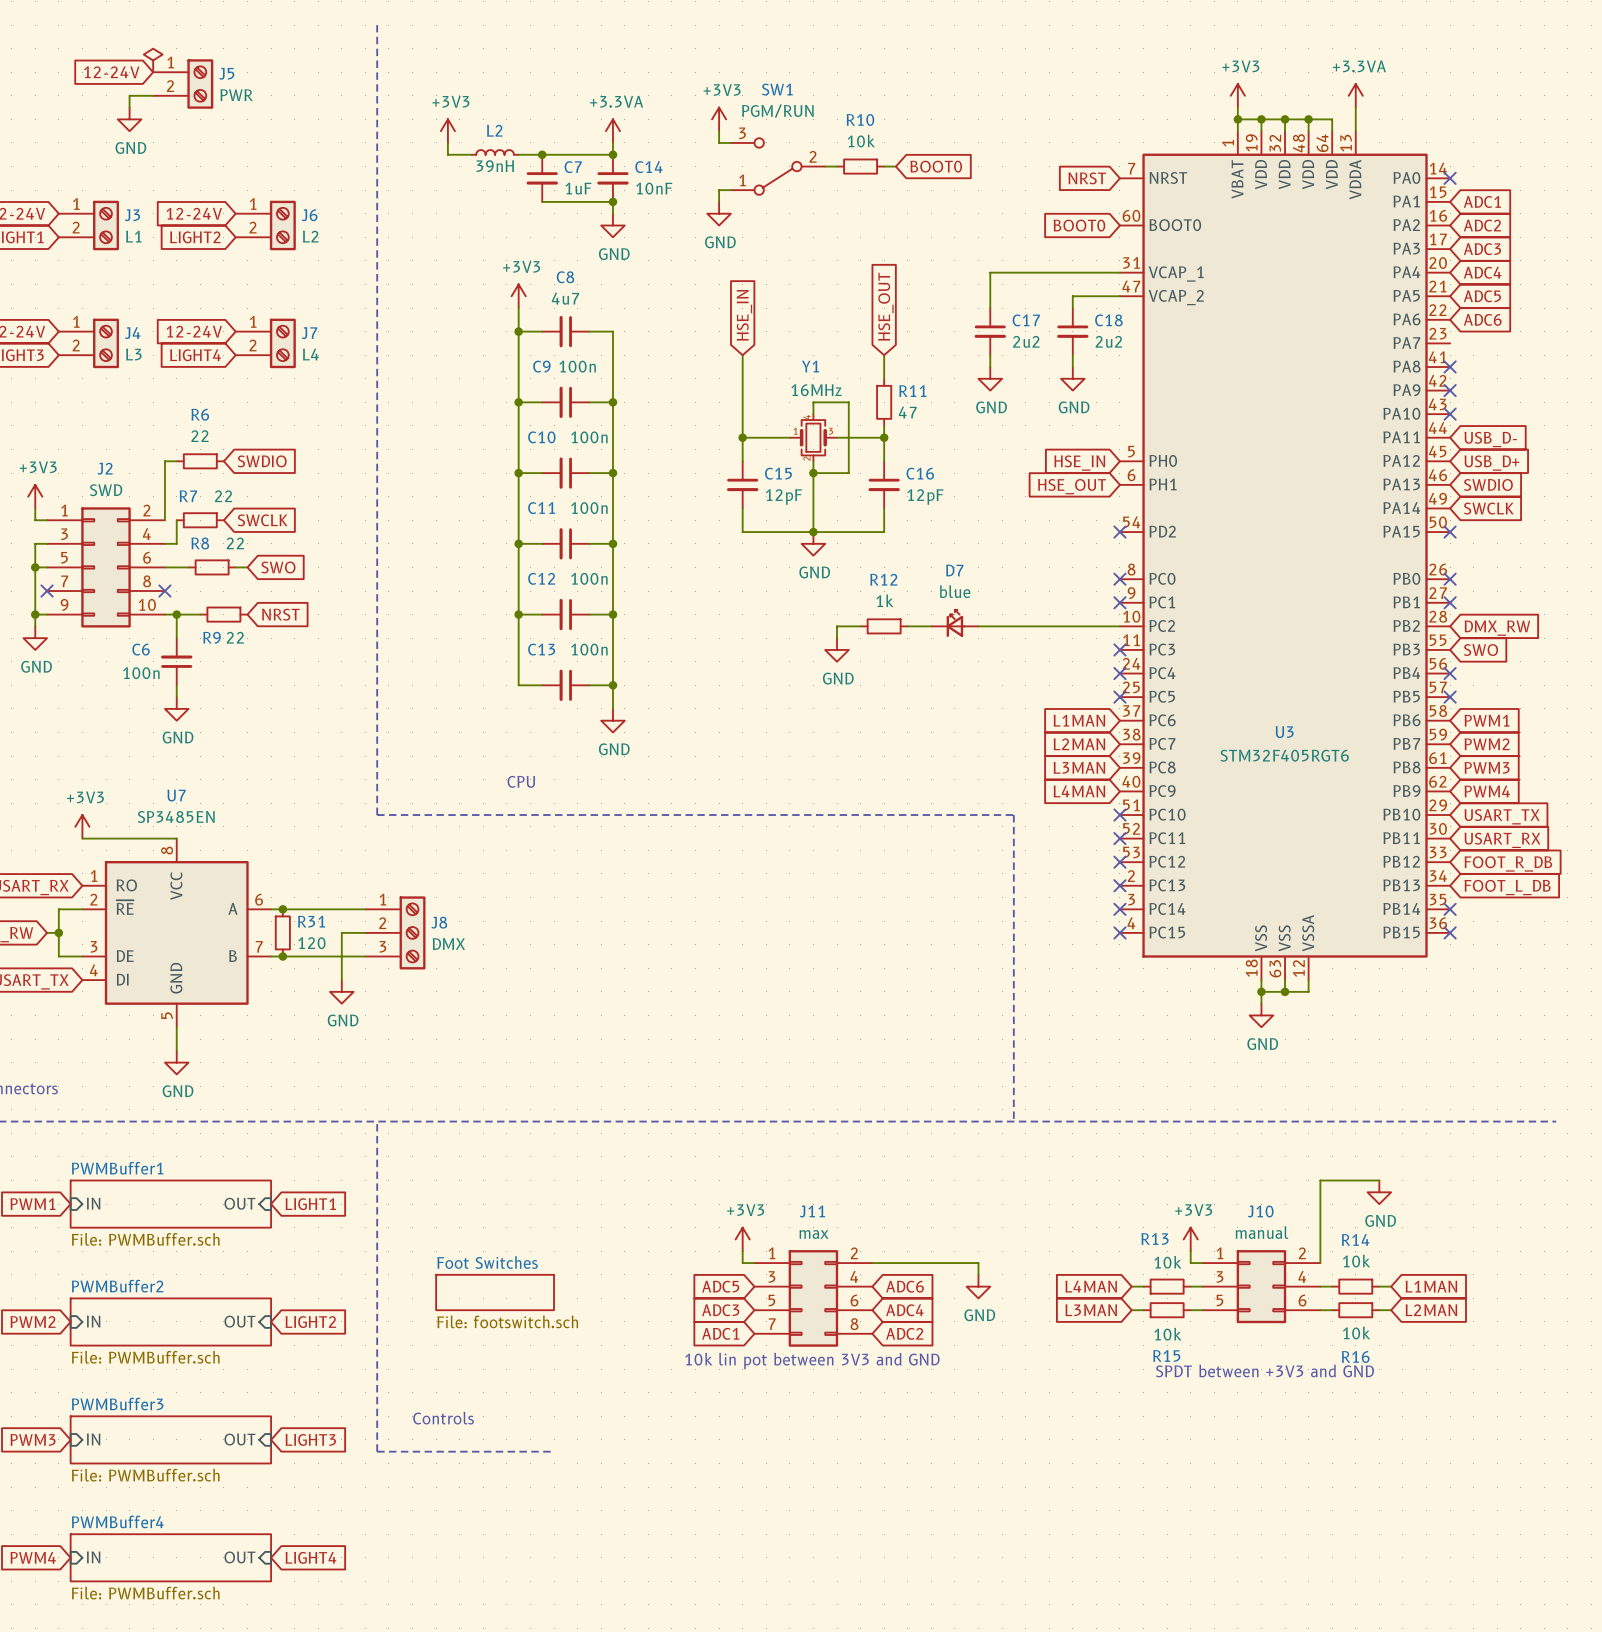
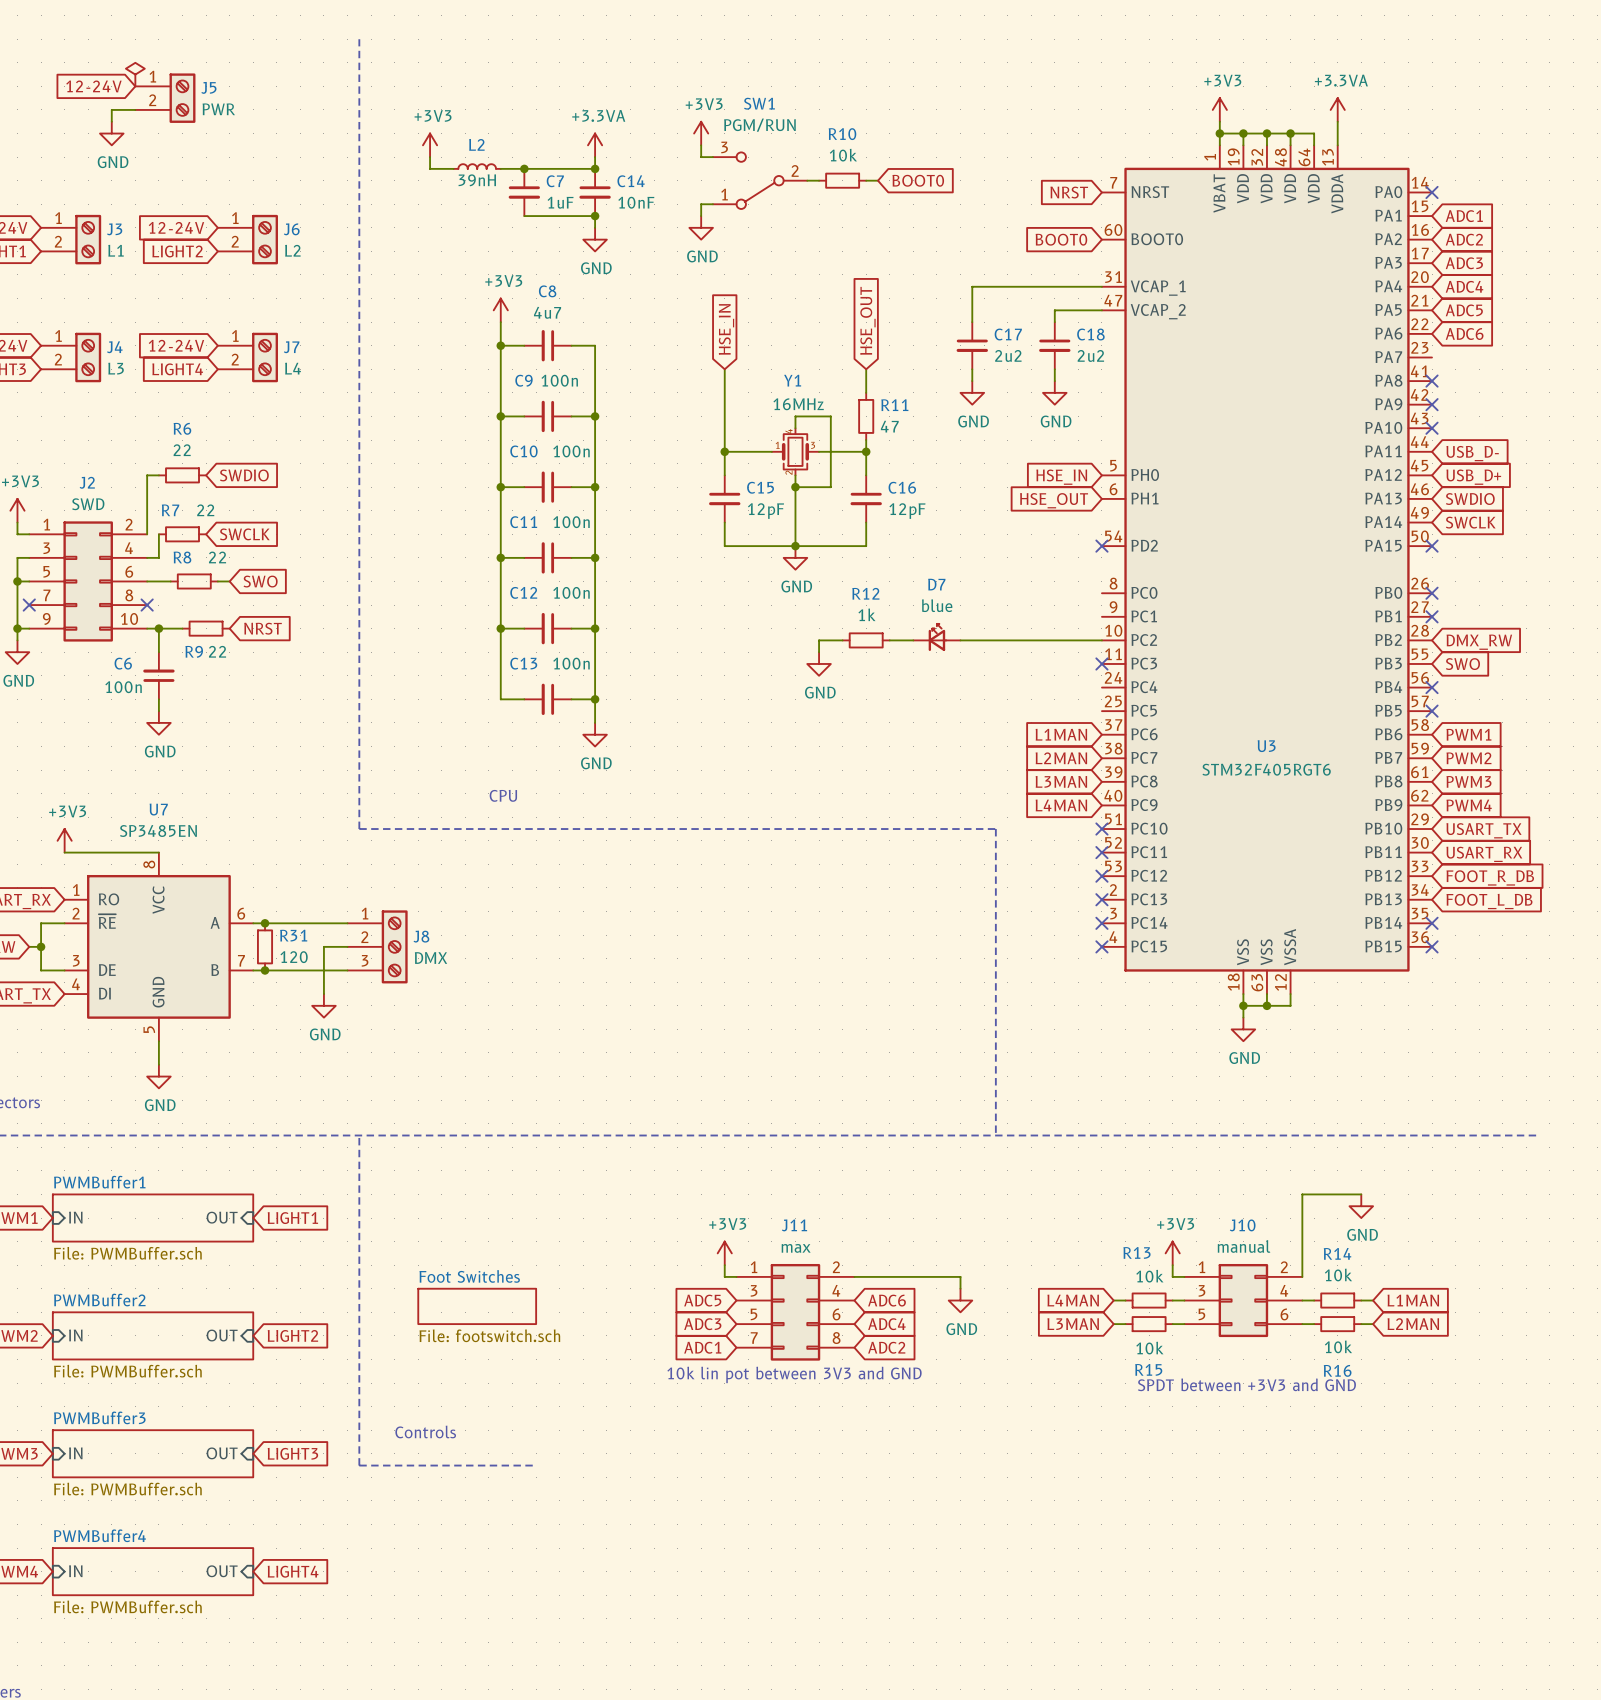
no-connect mark: (1119, 579) -> none
no-connect mark: (1119, 602) -> none
no-connect mark: (1119, 673) -> none
no-connect mark: (1119, 697) -> none

